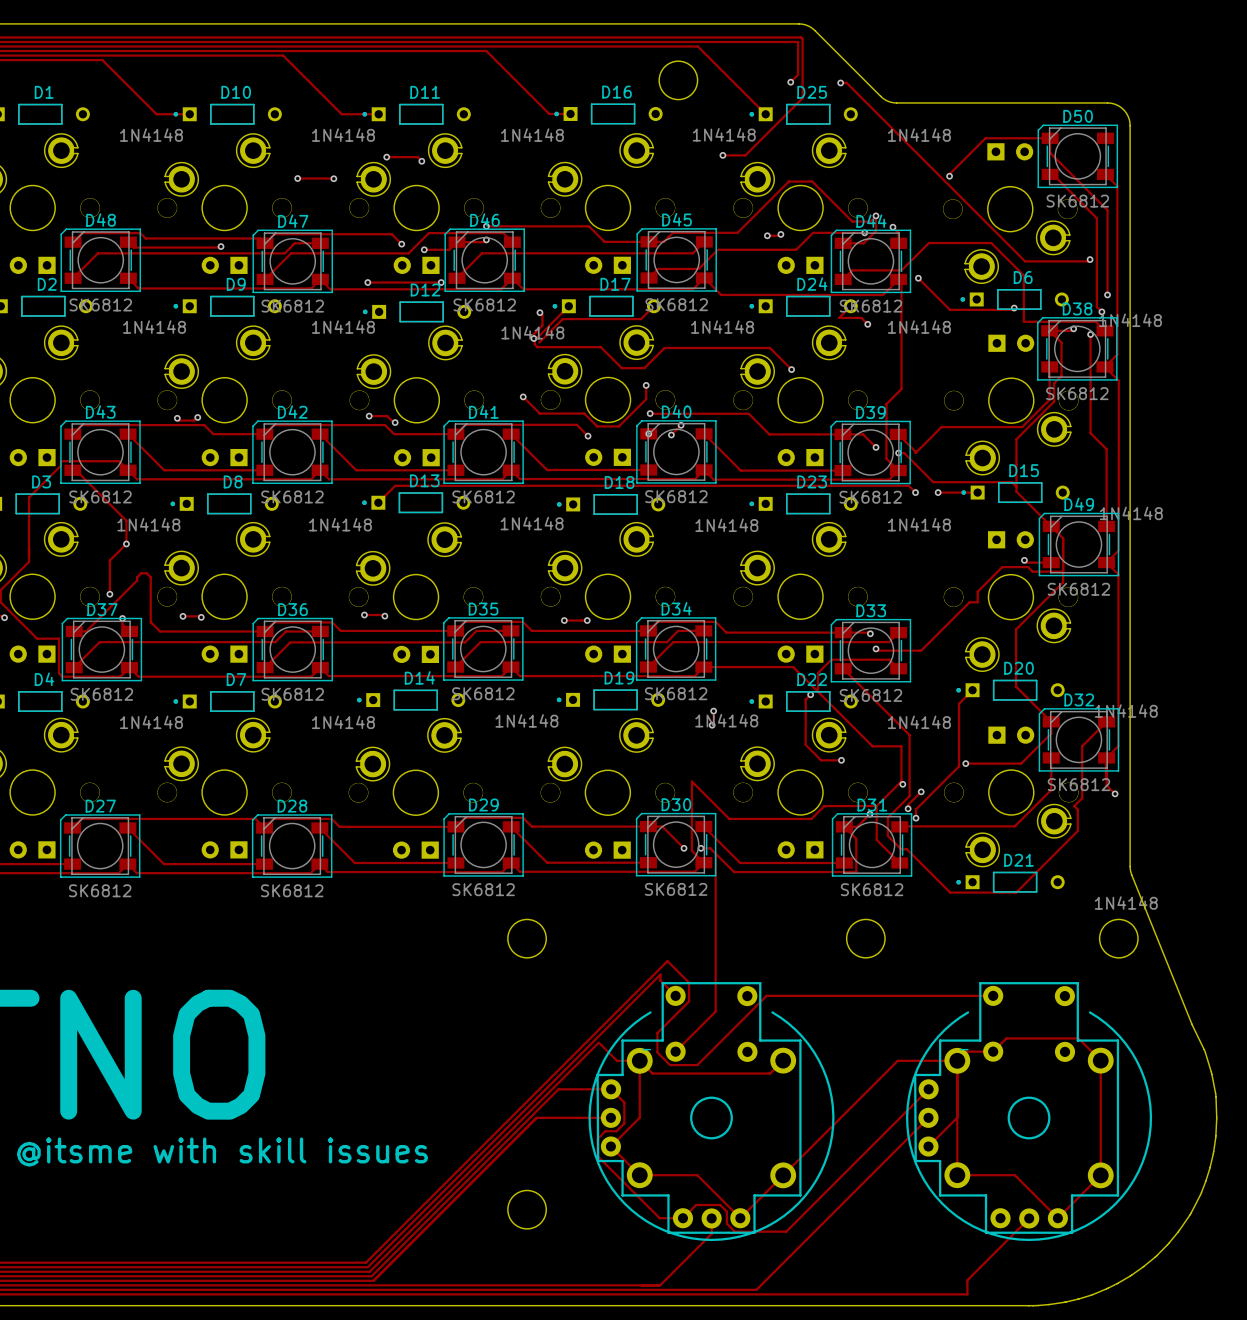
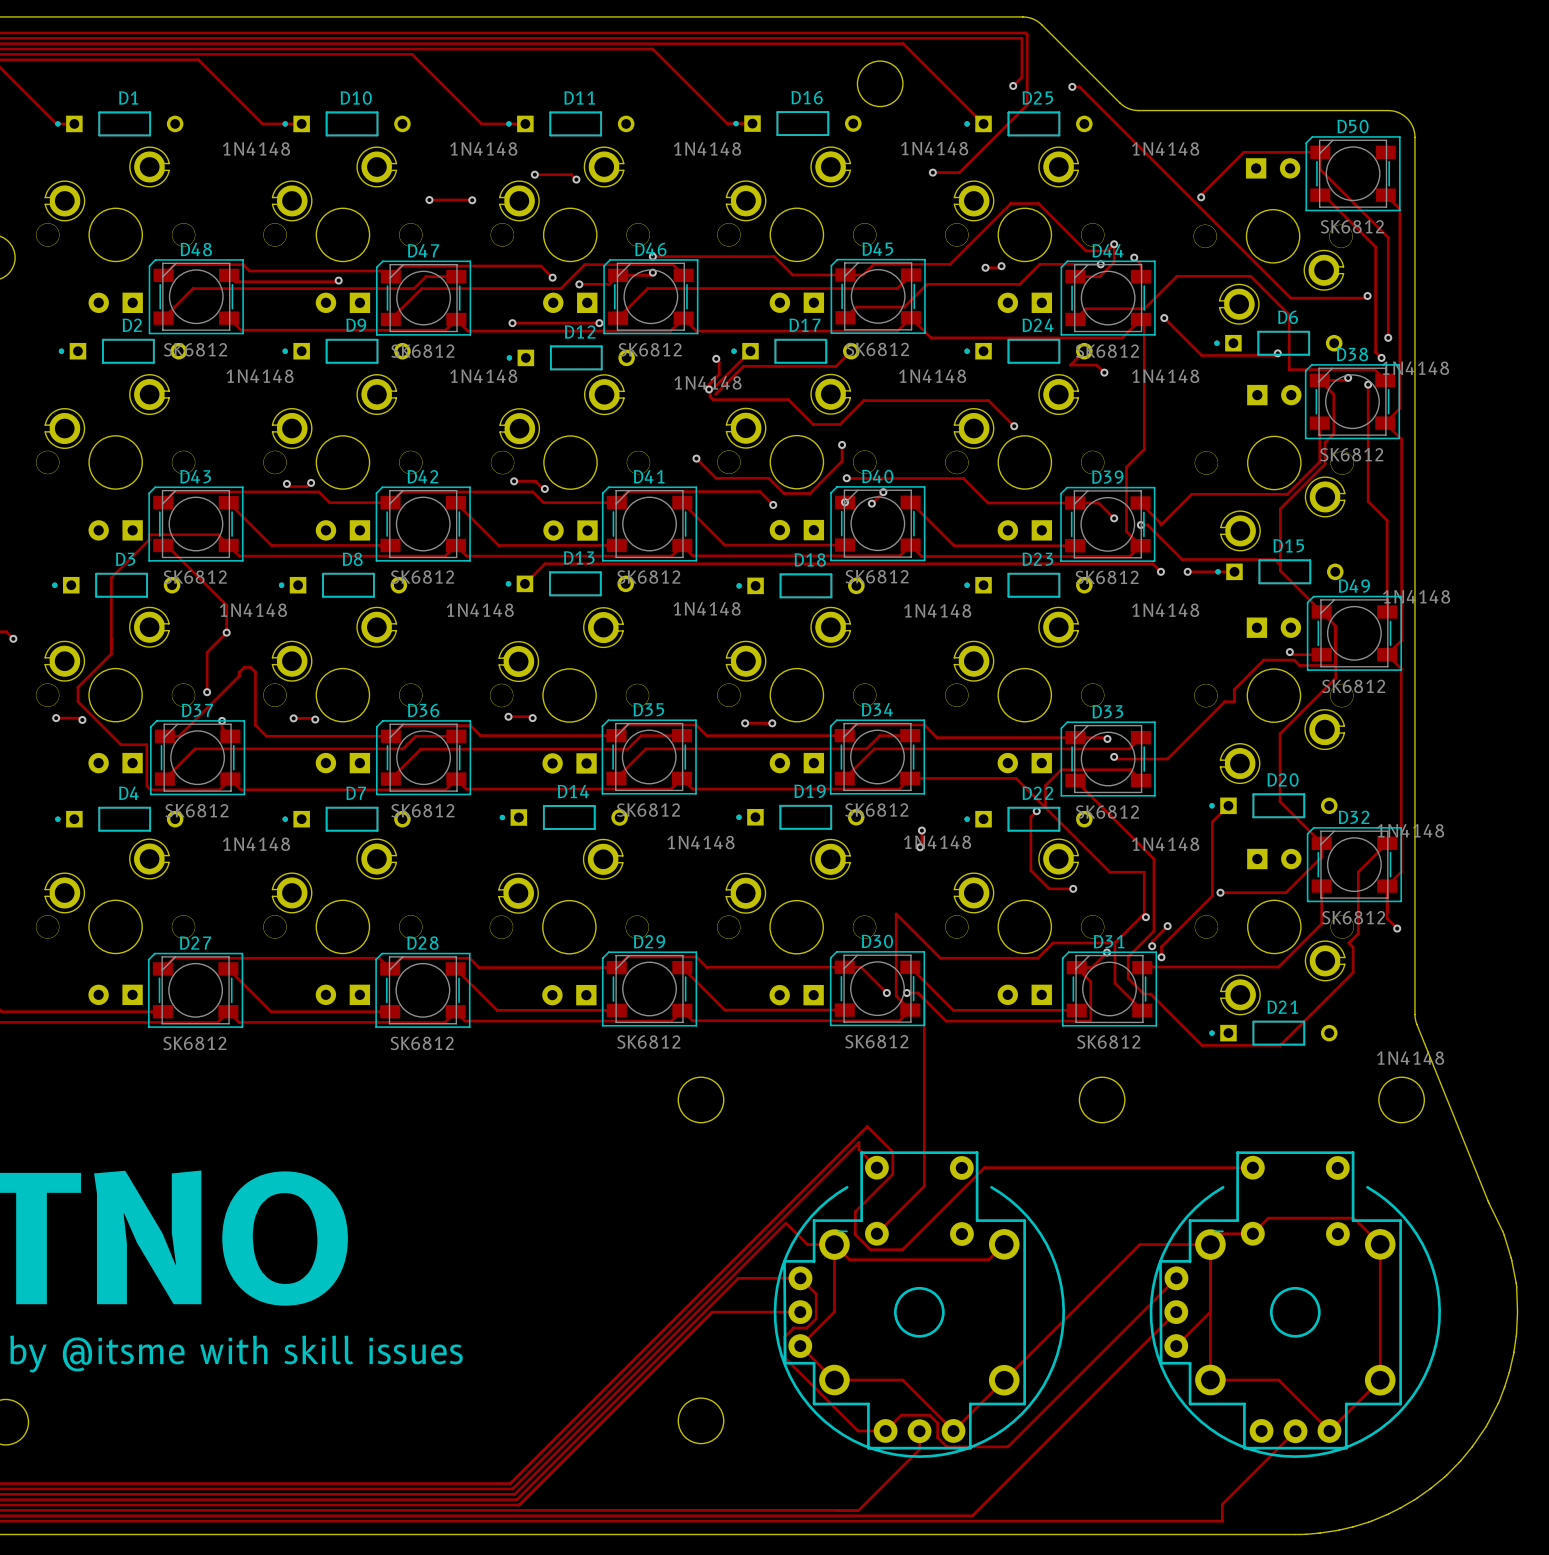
D7 value: 1N4148 (343, 722) -> none

